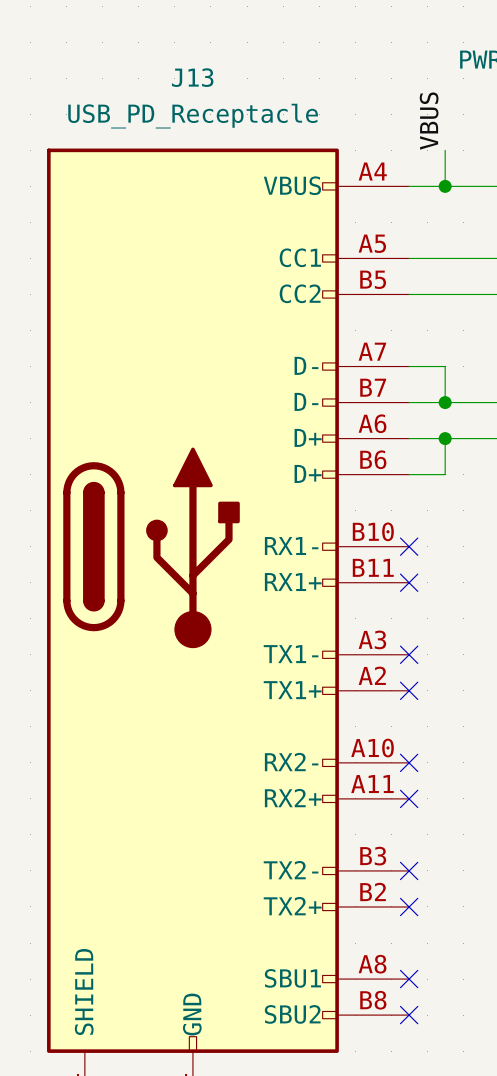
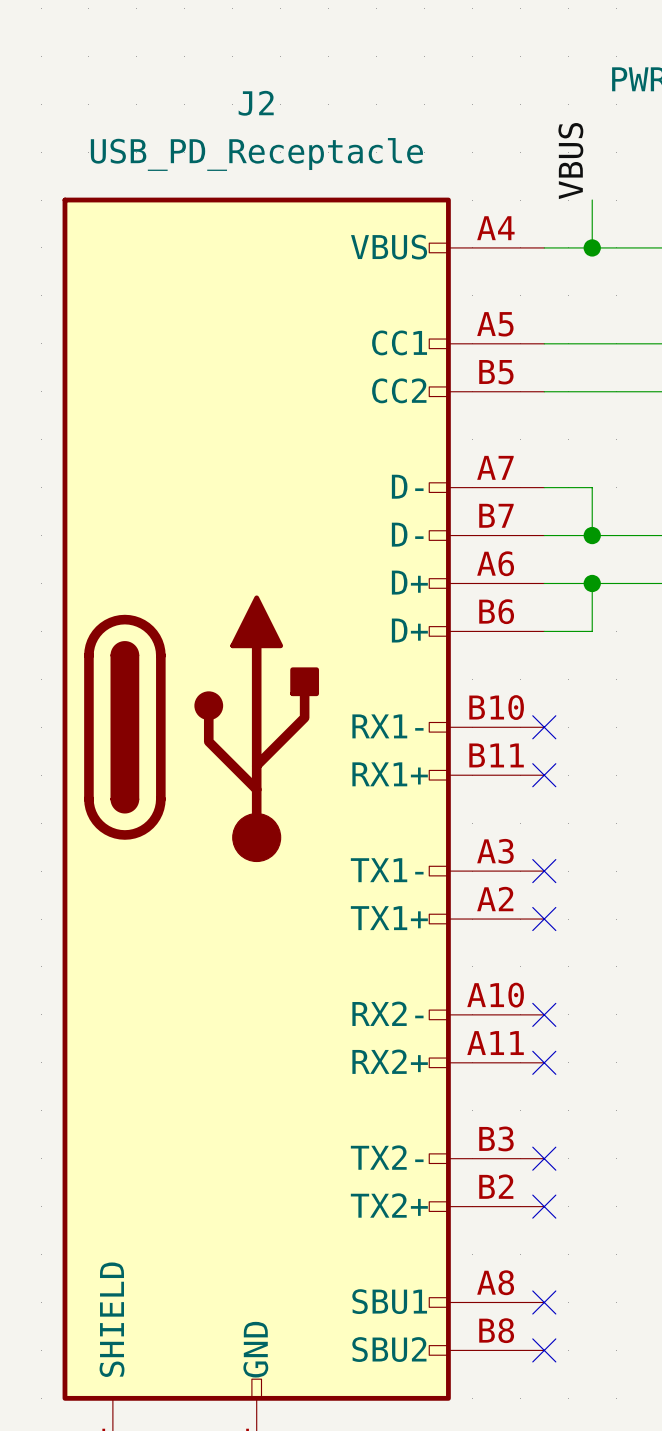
J13 name: J13 (192, 77) -> J2 (256, 103)

